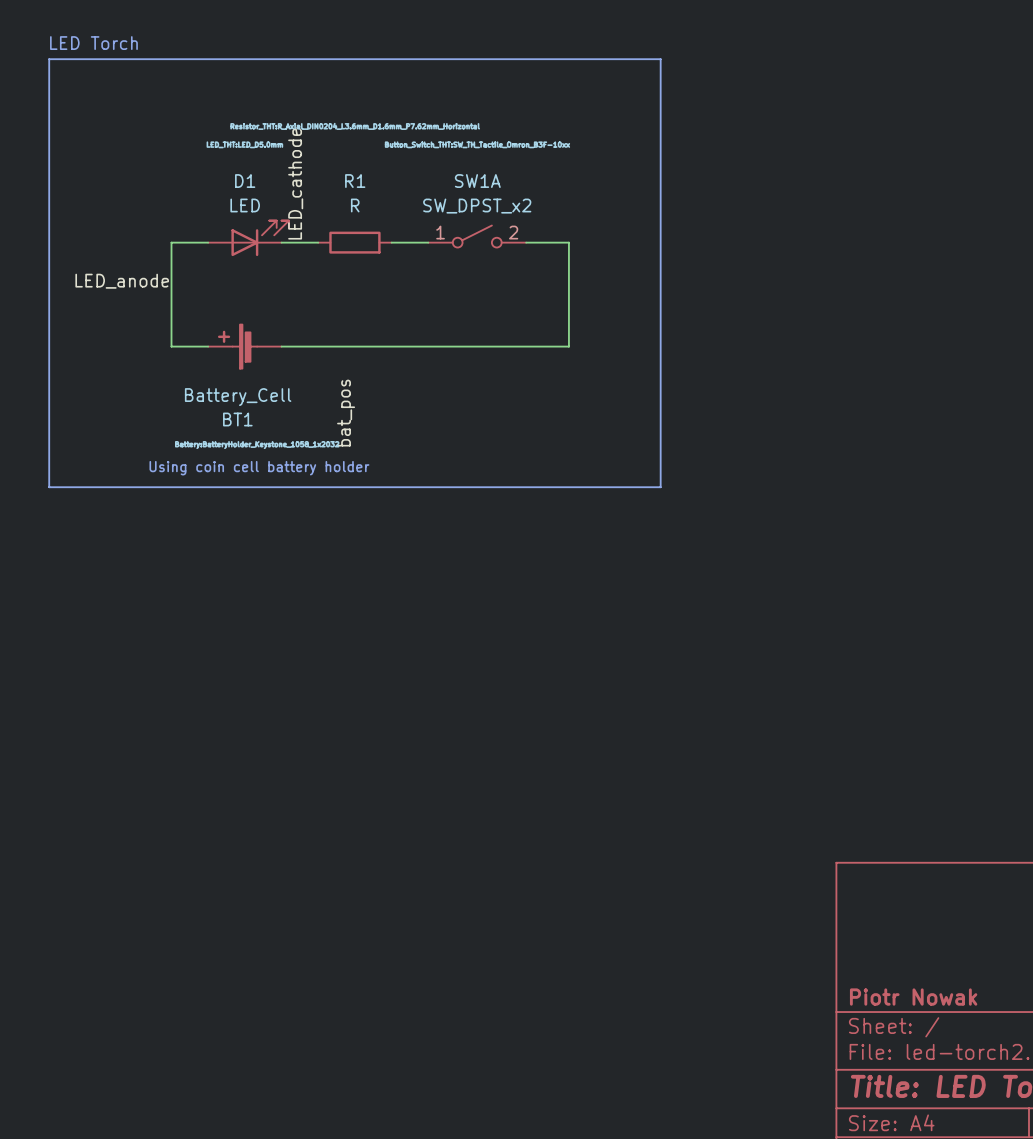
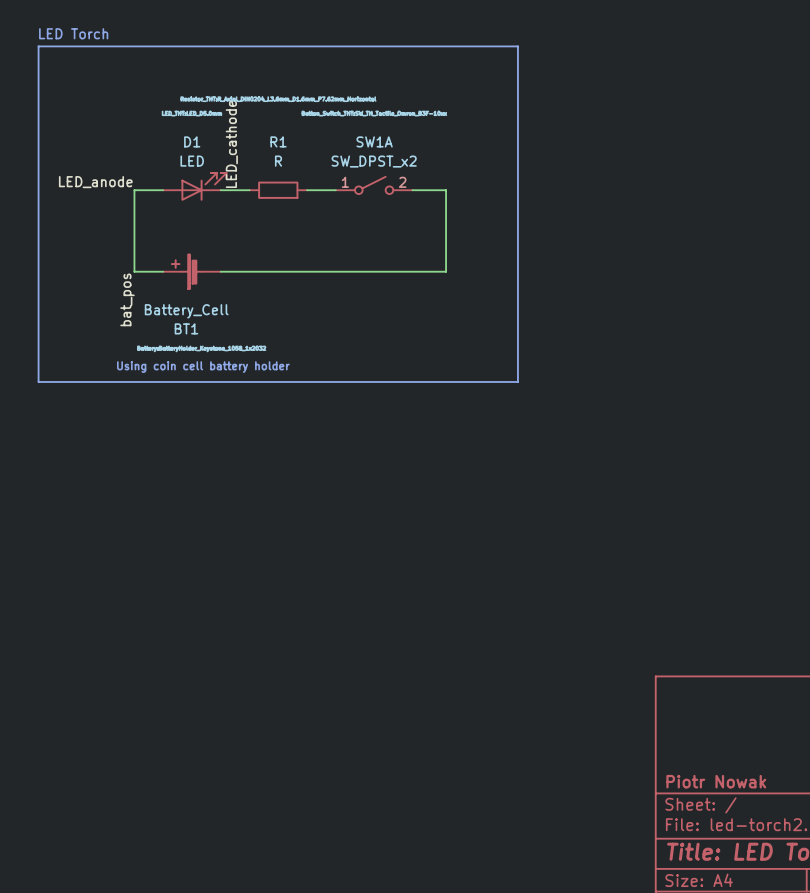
label position: LED_anode (122, 281) -> LED_anode (95, 182)
label position: bat_pos (346, 413) -> bat_pos (127, 299)

